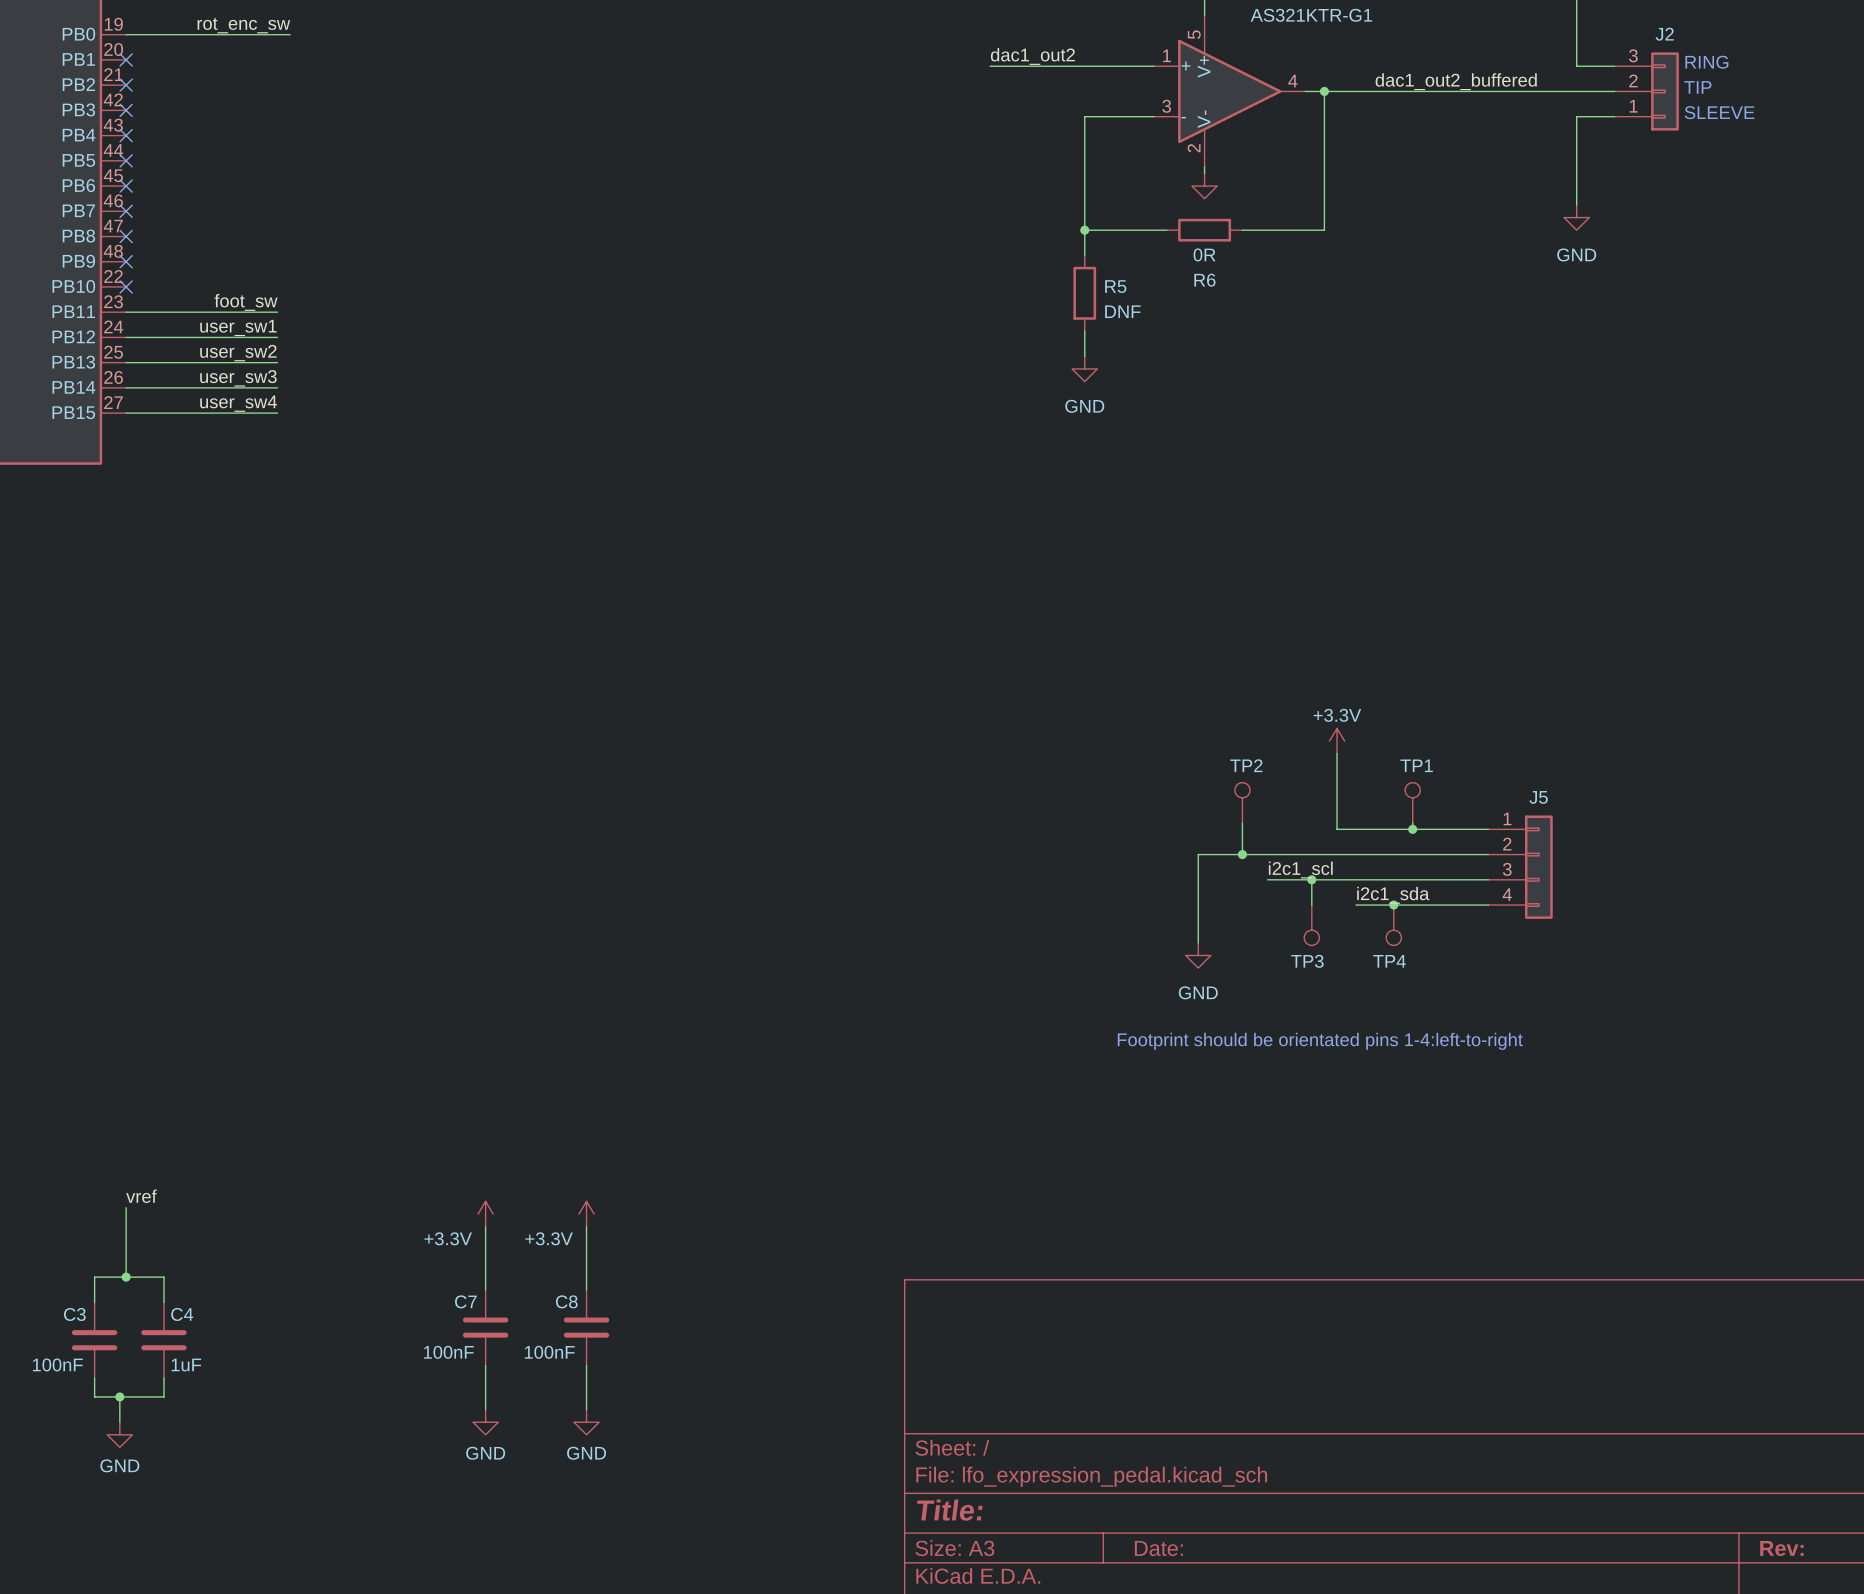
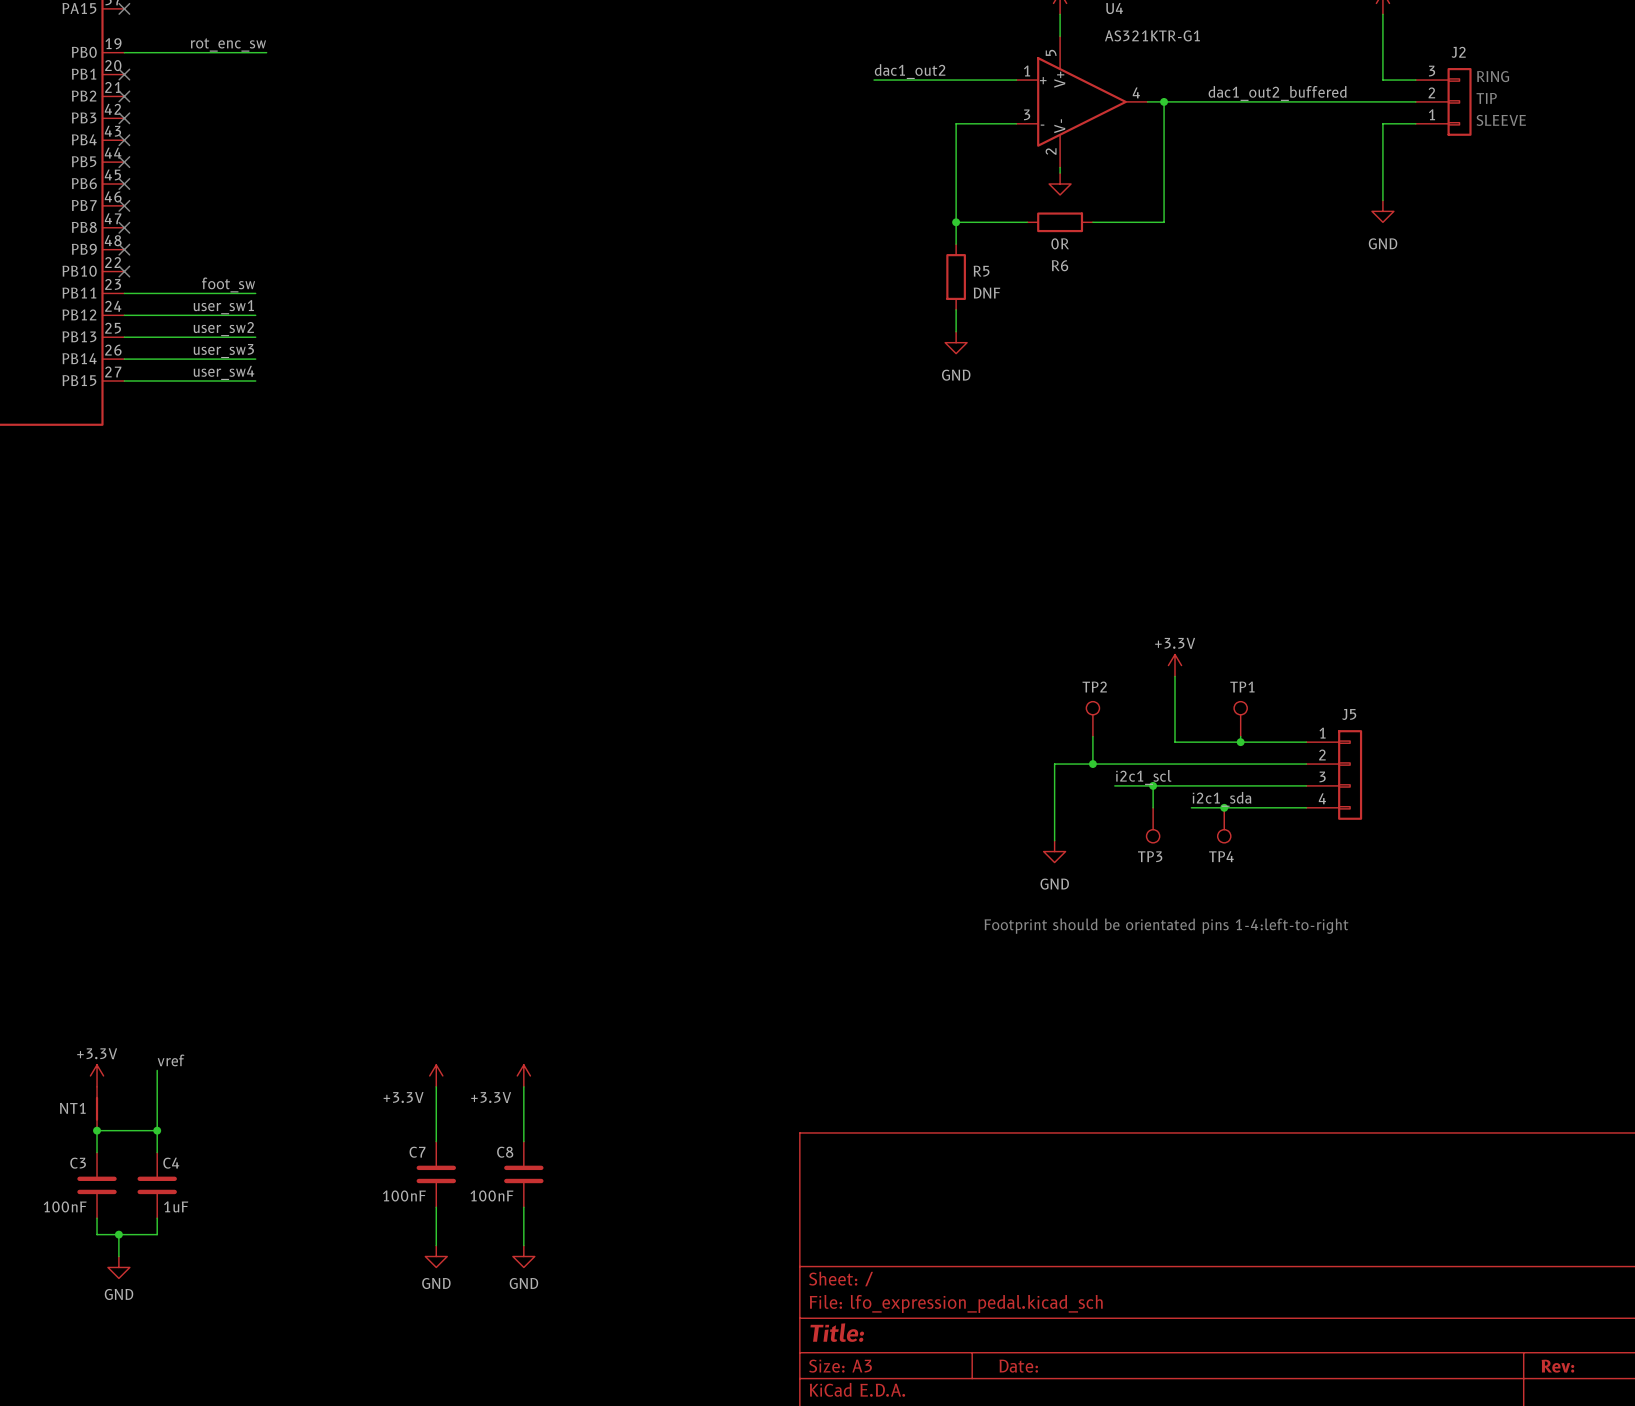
label position: vref (141, 1196) -> vref (171, 1060)
wire: (126, 1207) (126, 1277) -> (157, 1070) (157, 1130)
power symbol: none -> +3.3V (97, 1075)
NT1: none -> (97, 1108)
junction: none -> (97, 1130)
junction: (126, 1277) -> none
junction: none -> (157, 1130)

